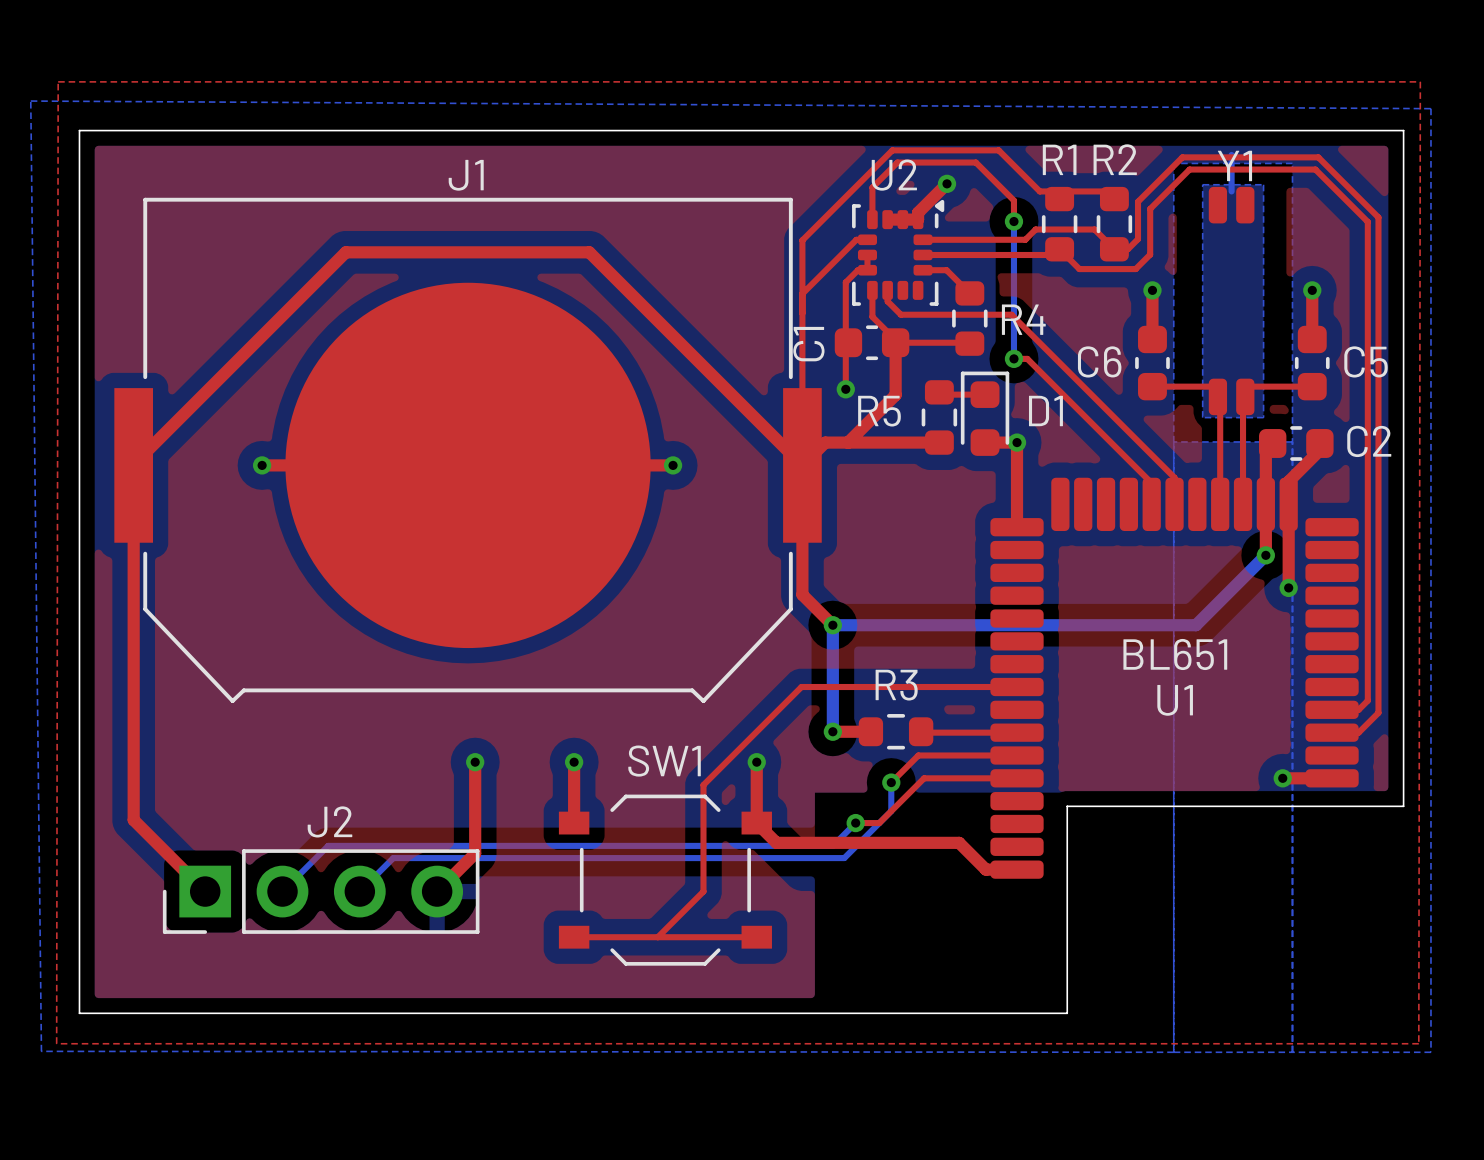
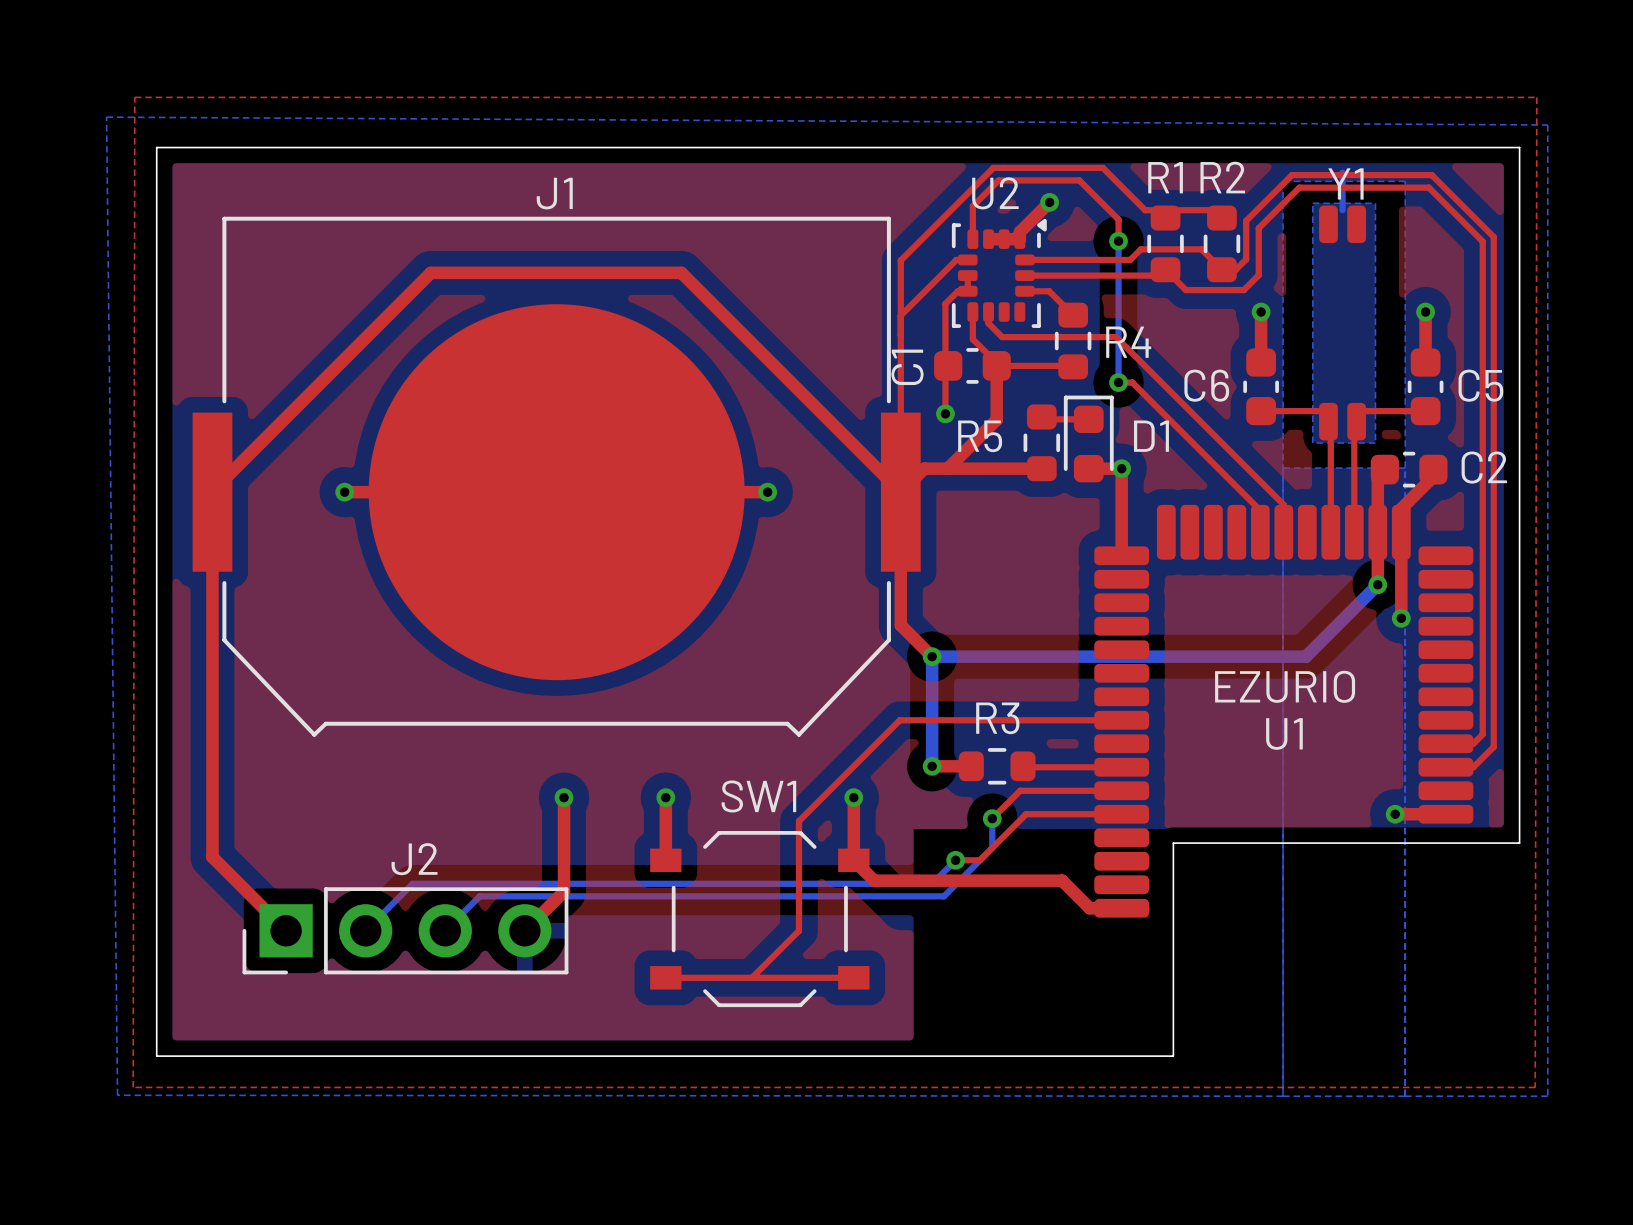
U1 text: BL651 (1175, 654) -> EZURIO (1285, 686)

